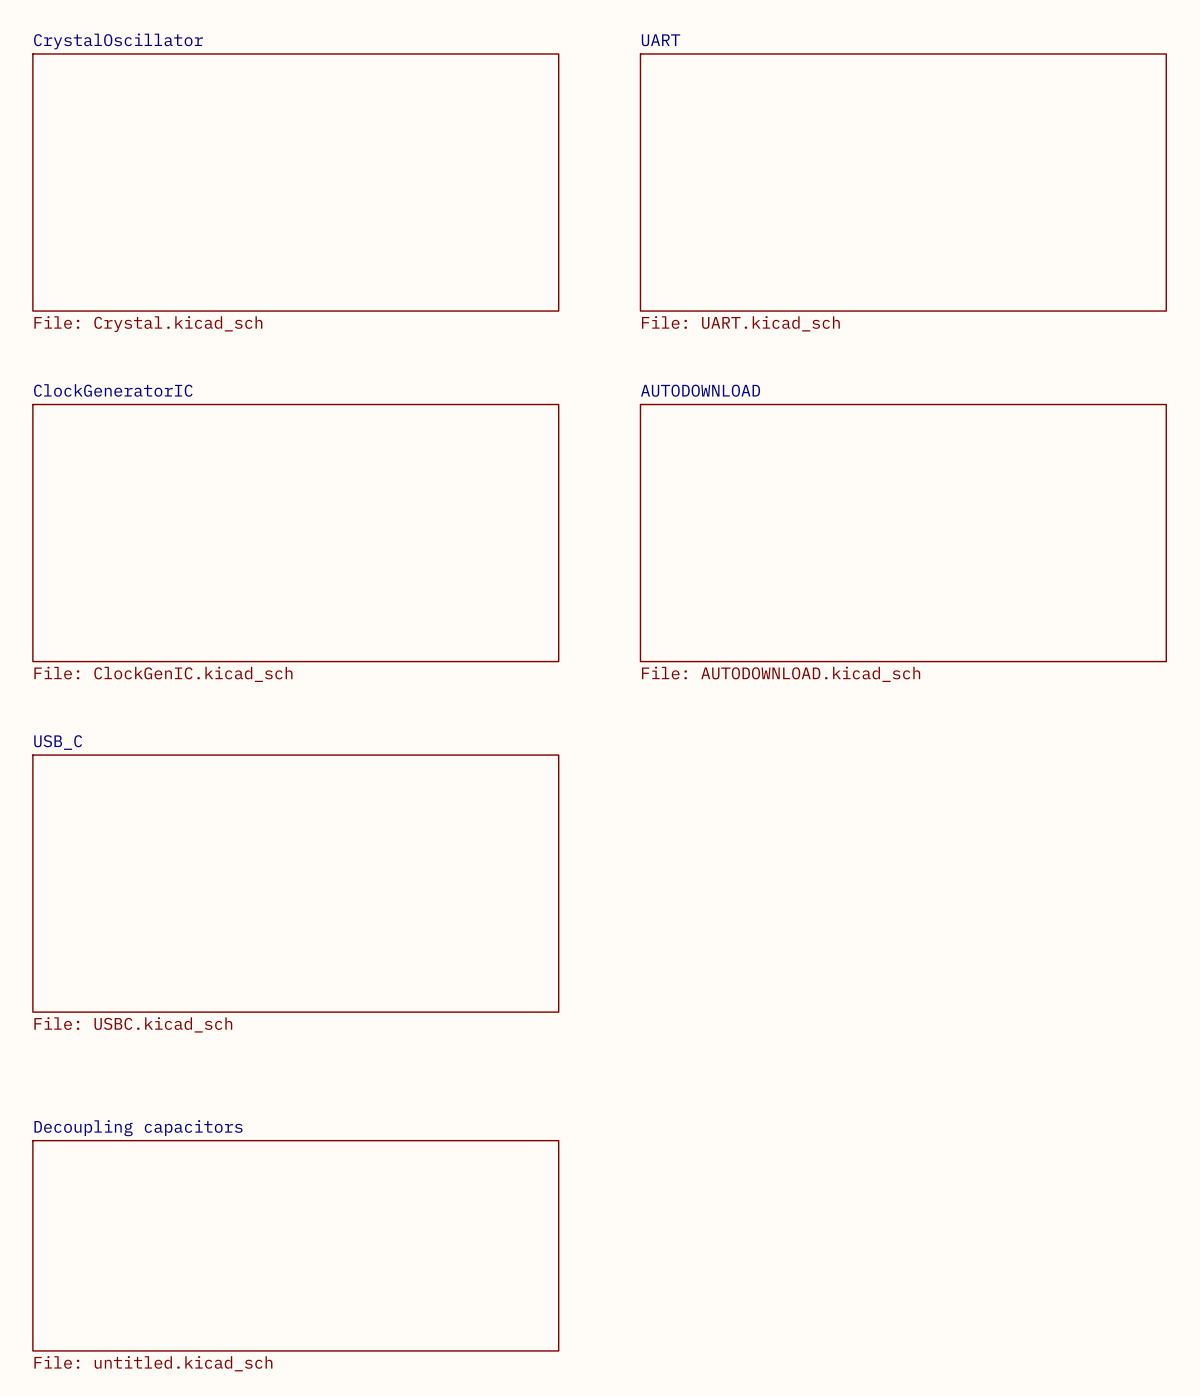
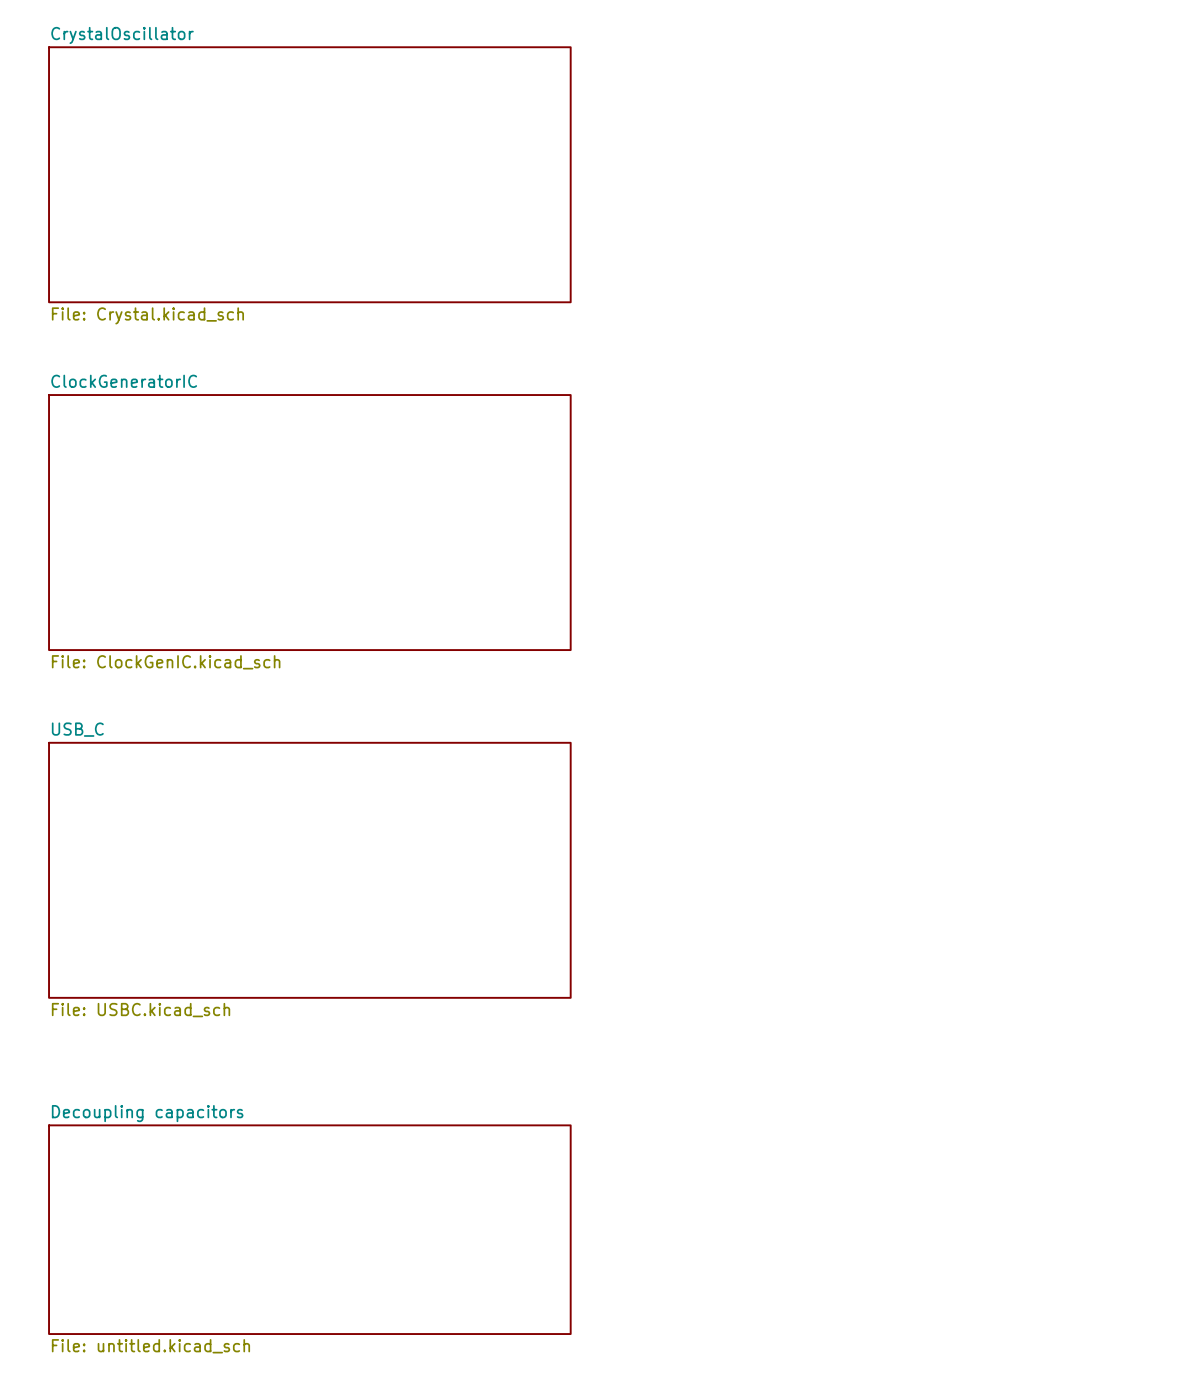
sheet UART: File: UART.kicad_sch (903, 182) -> none
sheet AUTODOWNLOAD: File: AUTODOWNLOAD.kicad_sch (903, 533) -> none

